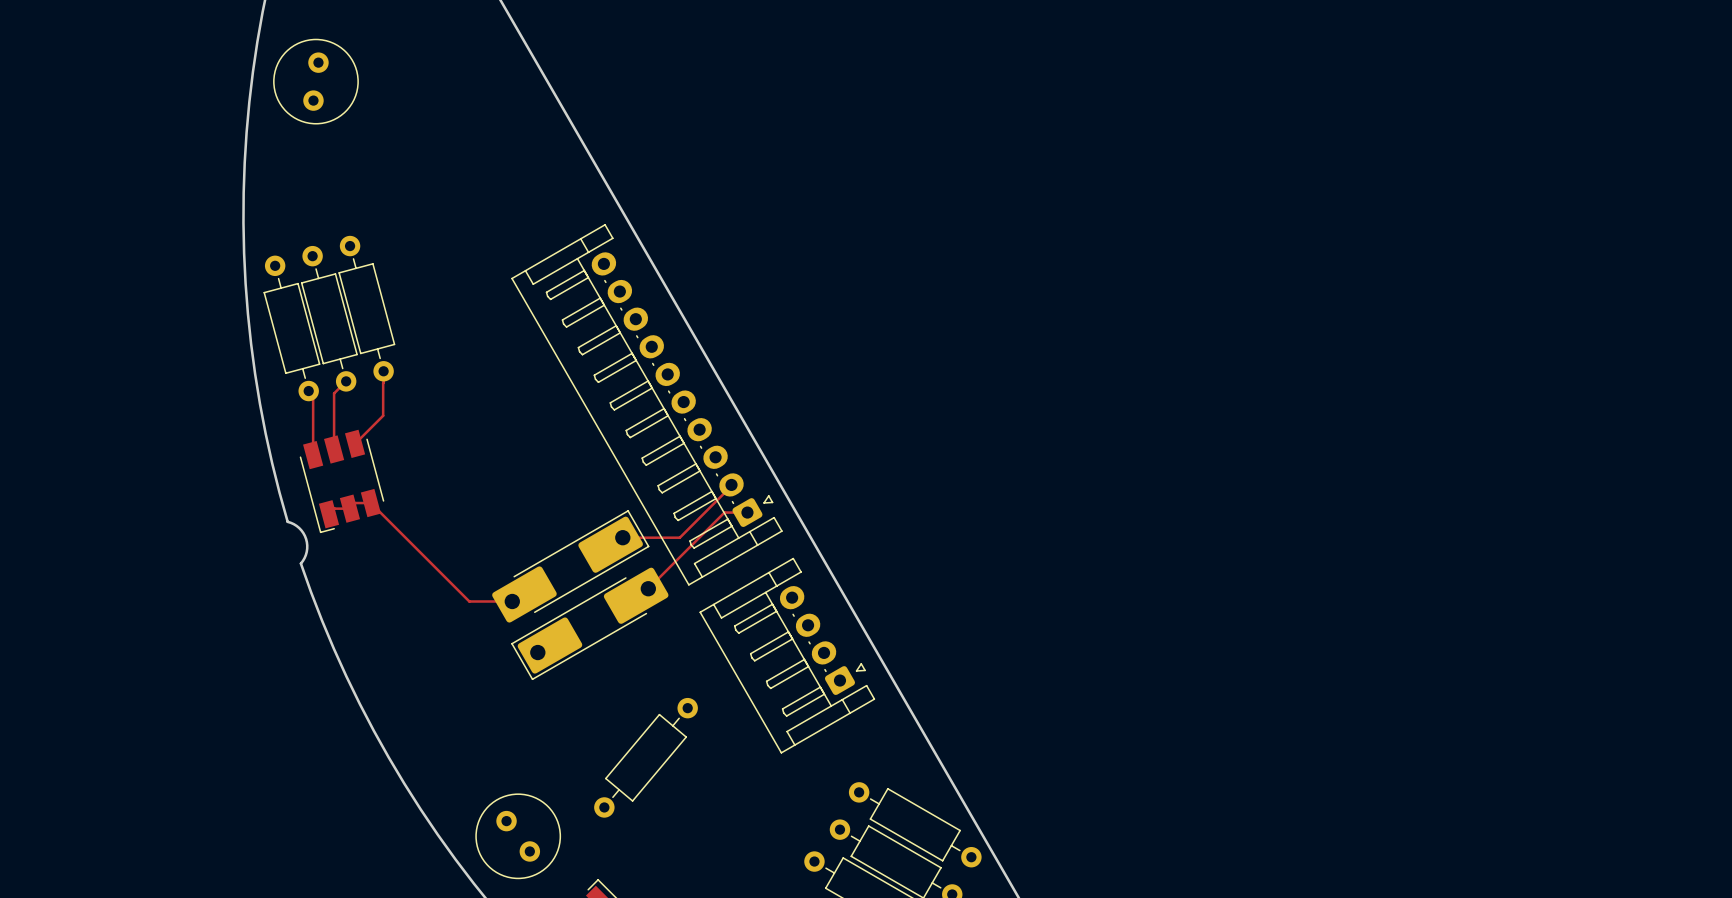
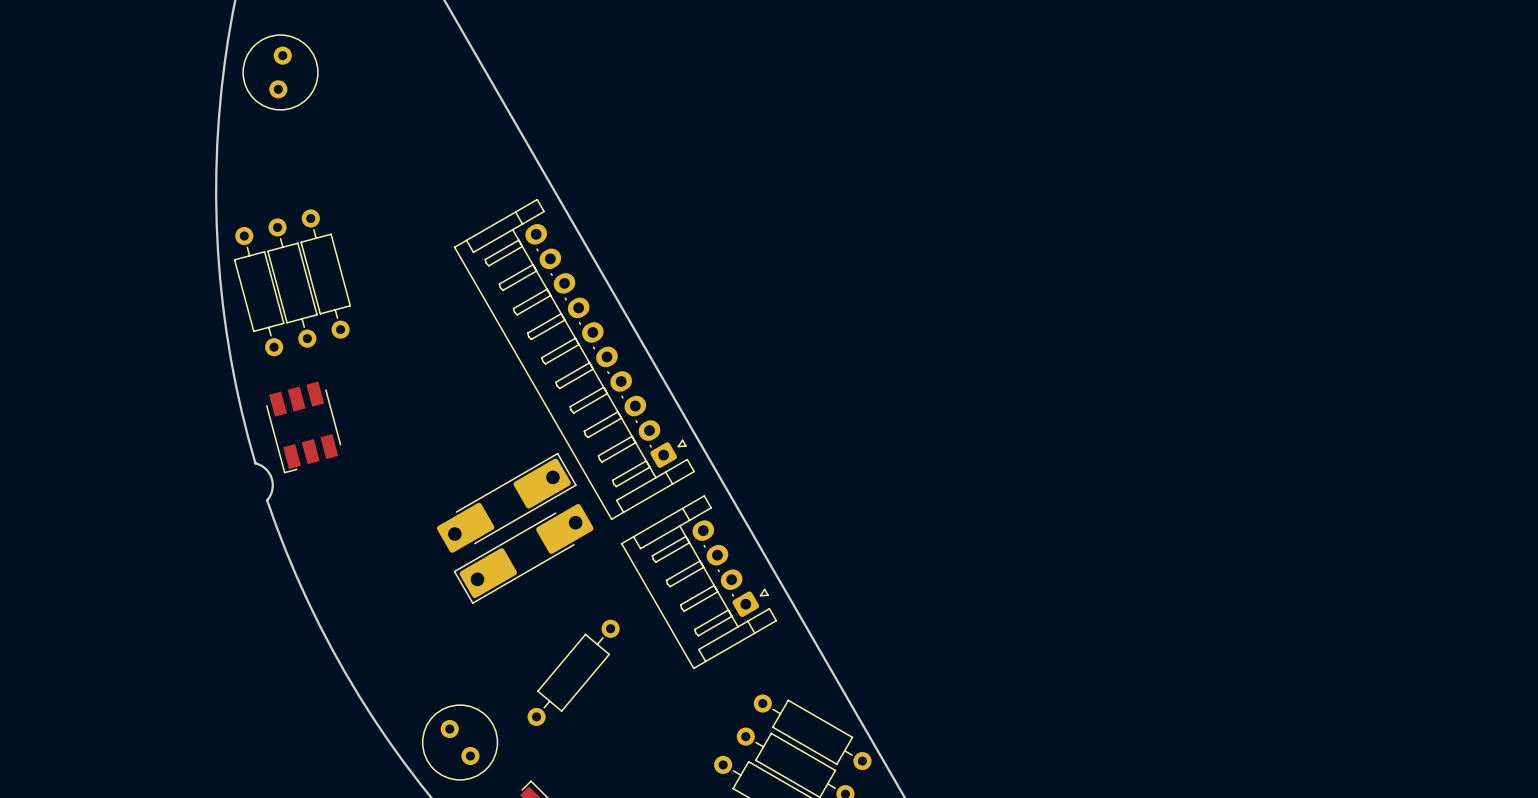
top track: (383, 371) (383, 415) (355, 443) -> none
top track: (346, 381) (334, 393) (334, 449) -> none
top track: (308, 391) (313, 395) (313, 455) -> none
top track: (731, 484) (679, 537) (622, 537) -> none
top track: (747, 512) (724, 512) (648, 588) -> none
top track: (329, 514) (334, 508) (349, 508) (355, 503) (370, 503) (469, 601) (512, 601) -> none

